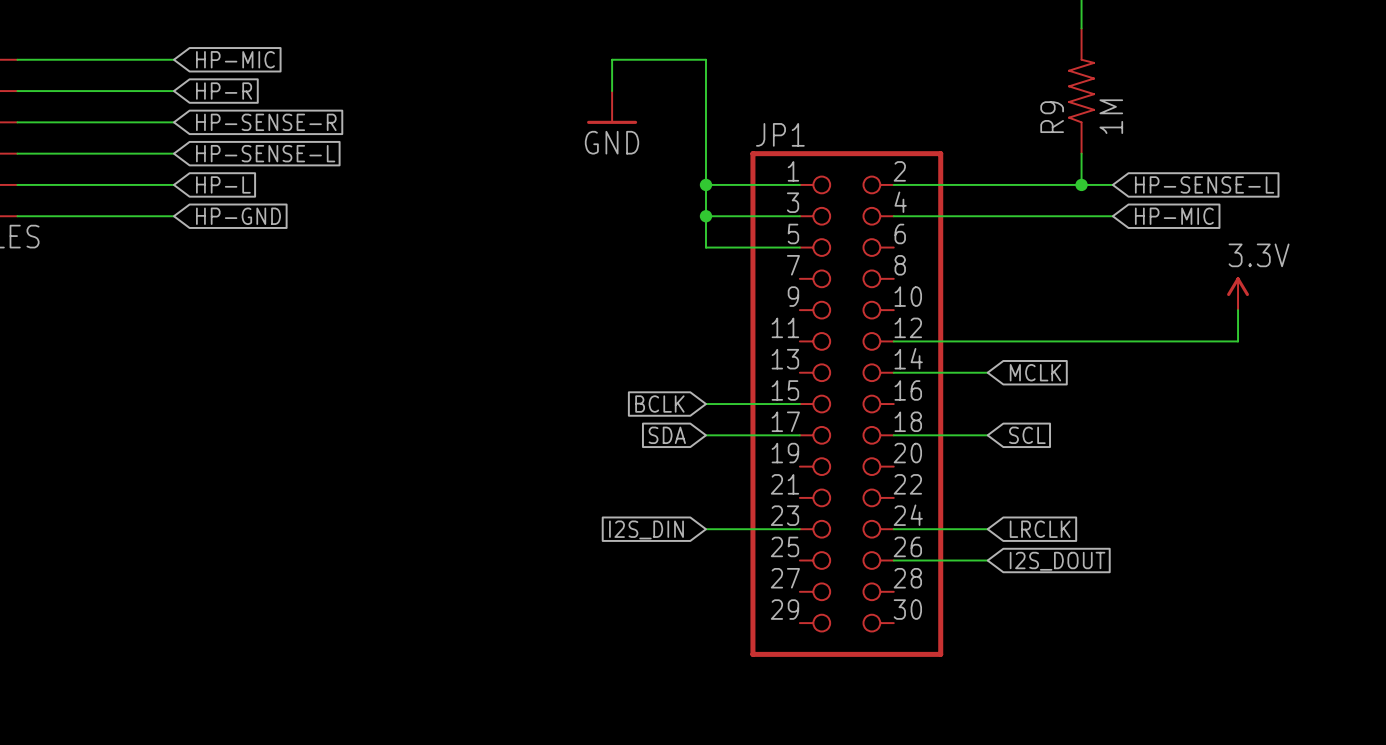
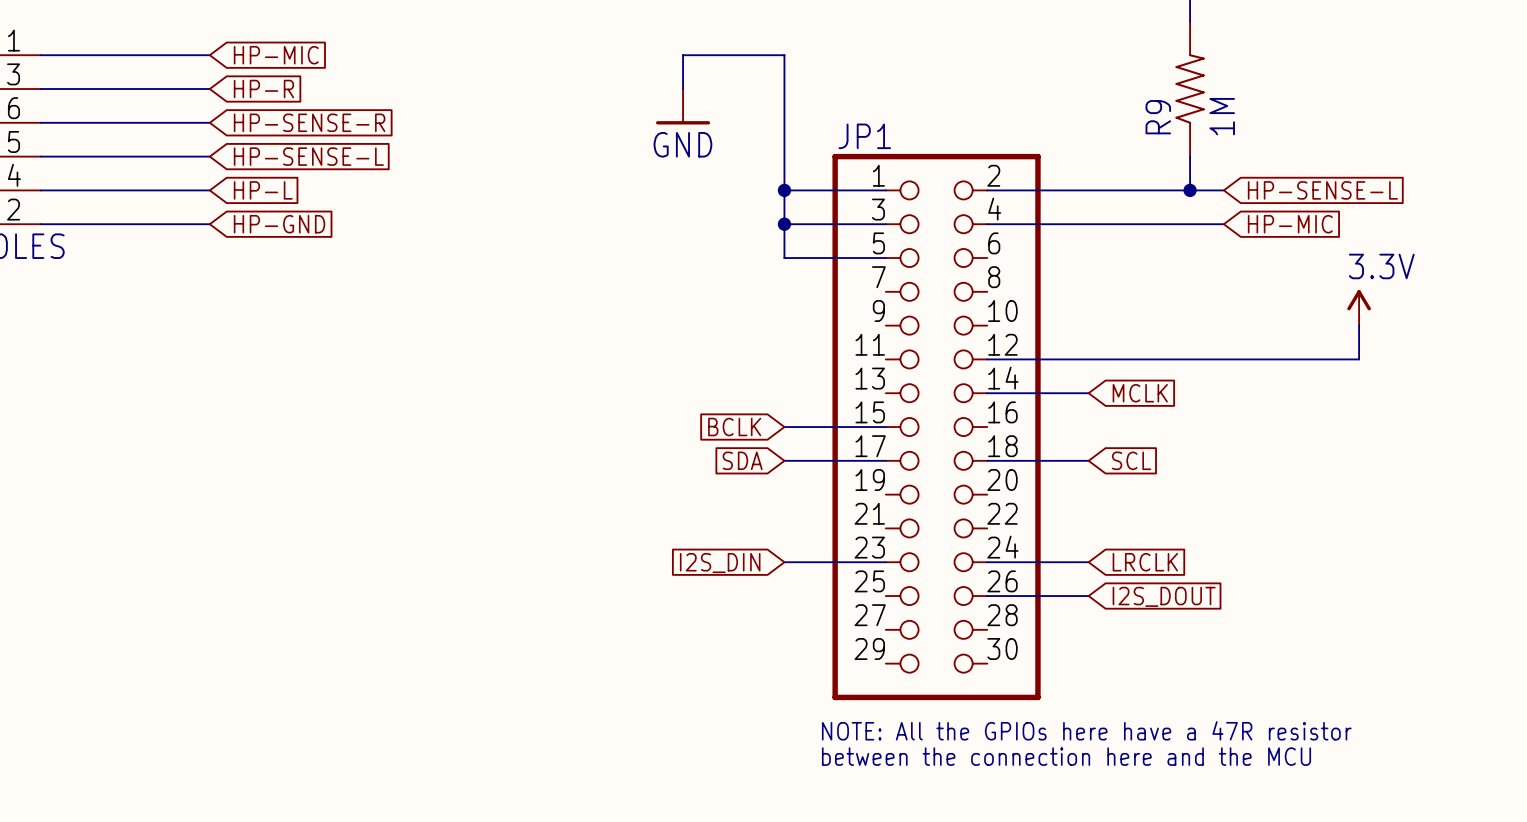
text: none -> NOTE: All the GPIOs here have a 47R resistor (1086, 730)
text: none -> between the connection here and the MCU (1066, 756)

